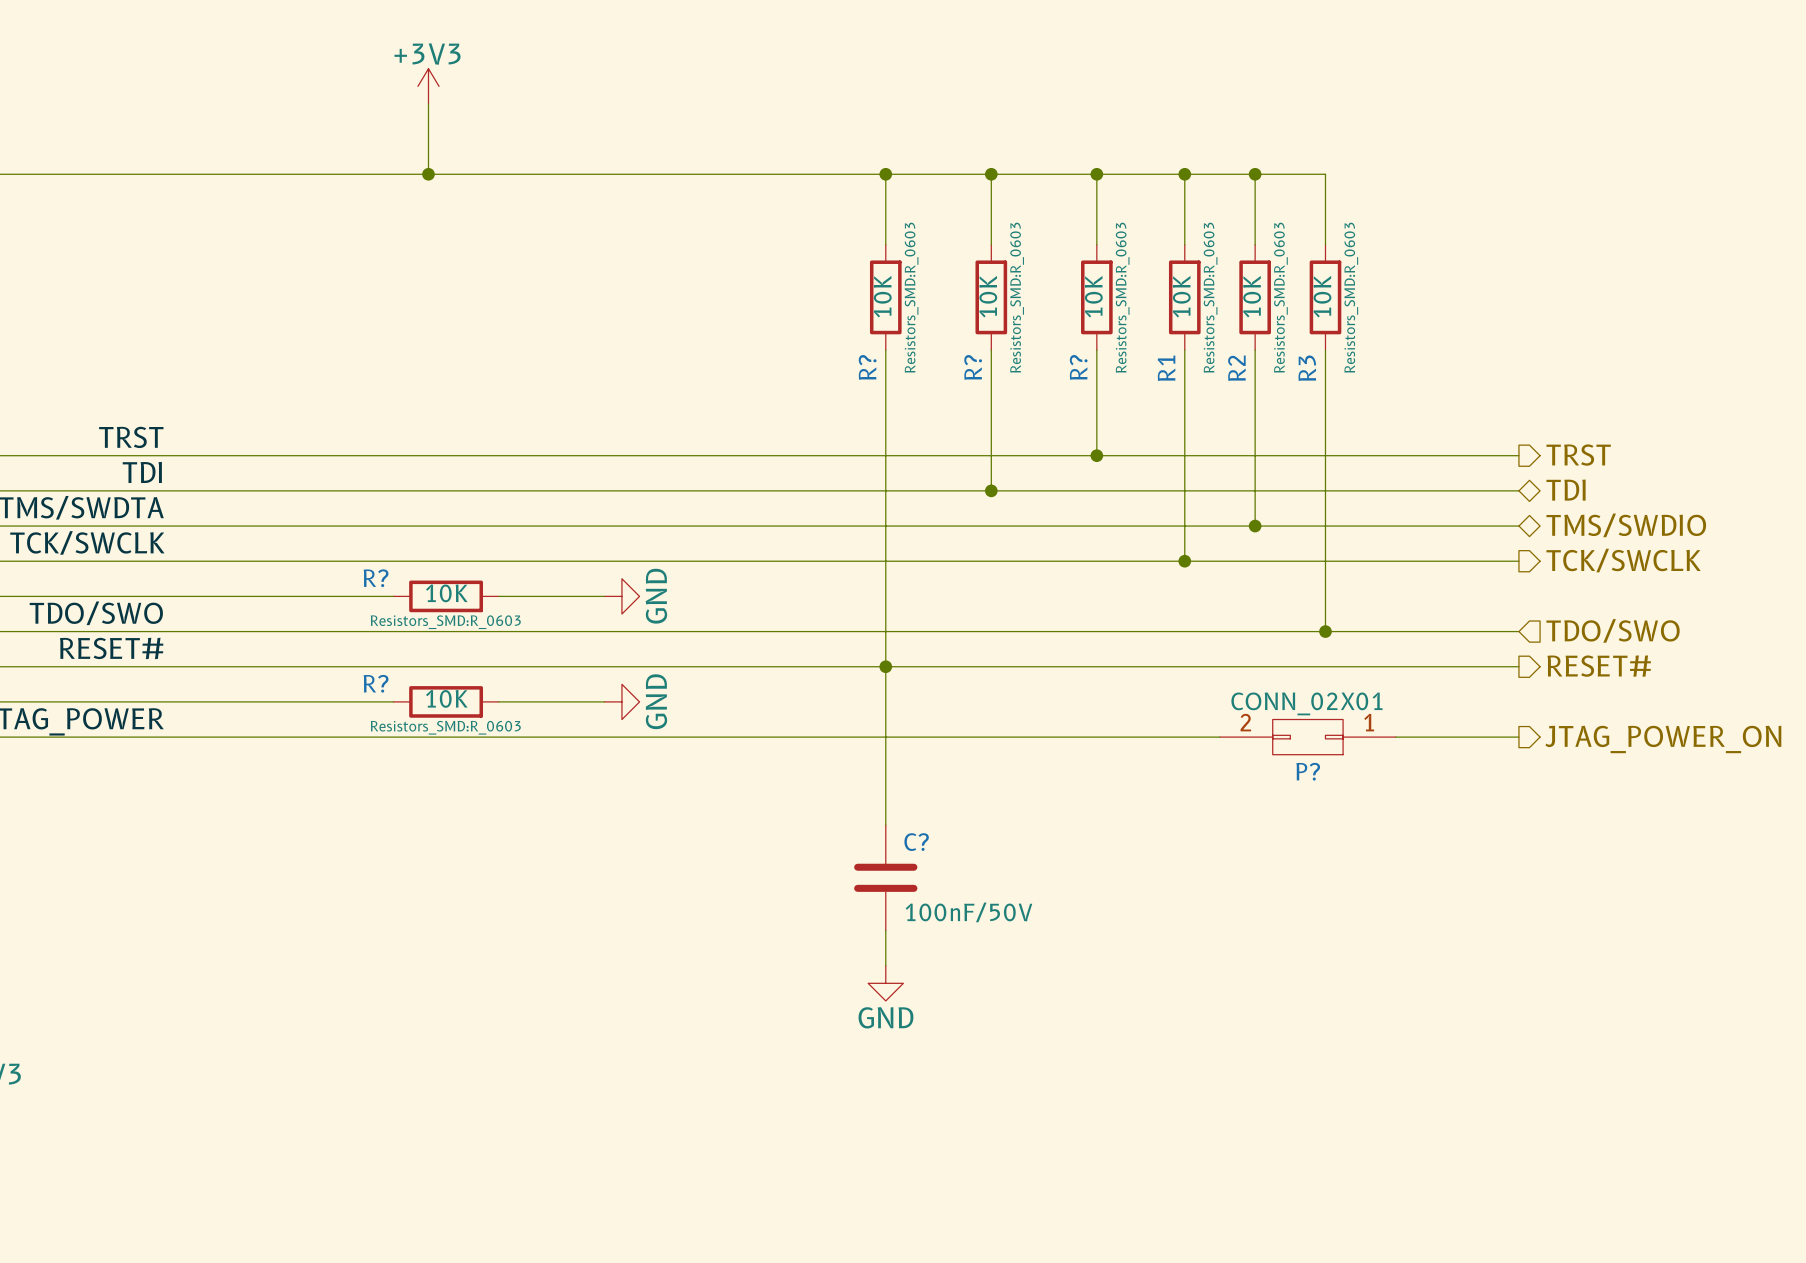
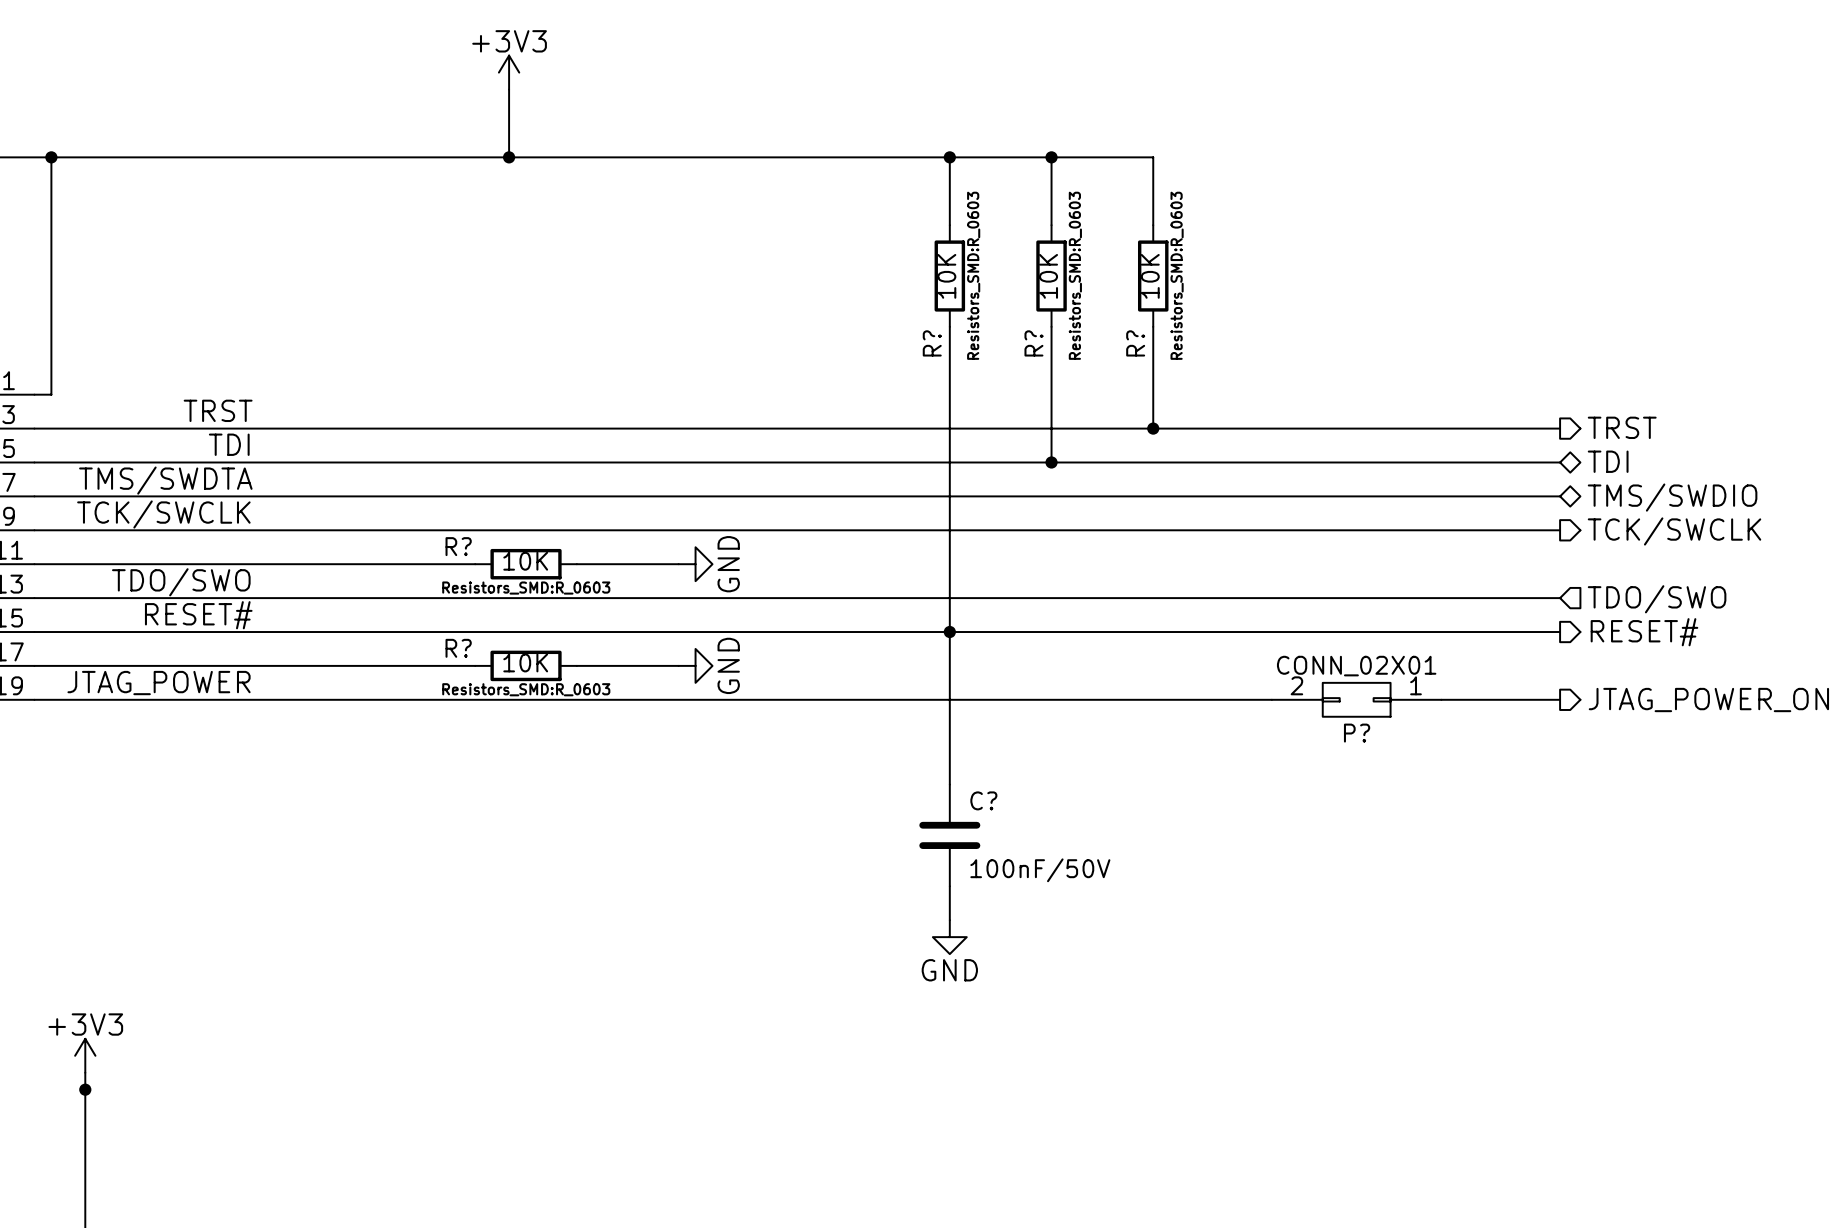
wire: (1096, 174) (1325, 174) (1325, 244) -> none
junction: (1096, 174) -> none
wire: (1184, 174) (1184, 244) -> none
junction: (1184, 174) -> none
wire: (1255, 174) (1255, 244) -> none
junction: (1255, 174) -> none
R1: 10K (1184, 297) -> none
R2: 10K (1255, 297) -> none
R3: 10K (1325, 297) -> none
wire: (1184, 350) (1184, 561) -> none
wire: (1255, 350) (1255, 526) -> none
wire: (1325, 350) (1325, 631) -> none
junction: (1255, 526) -> none
junction: (1184, 561) -> none
junction: (1325, 631) -> none

